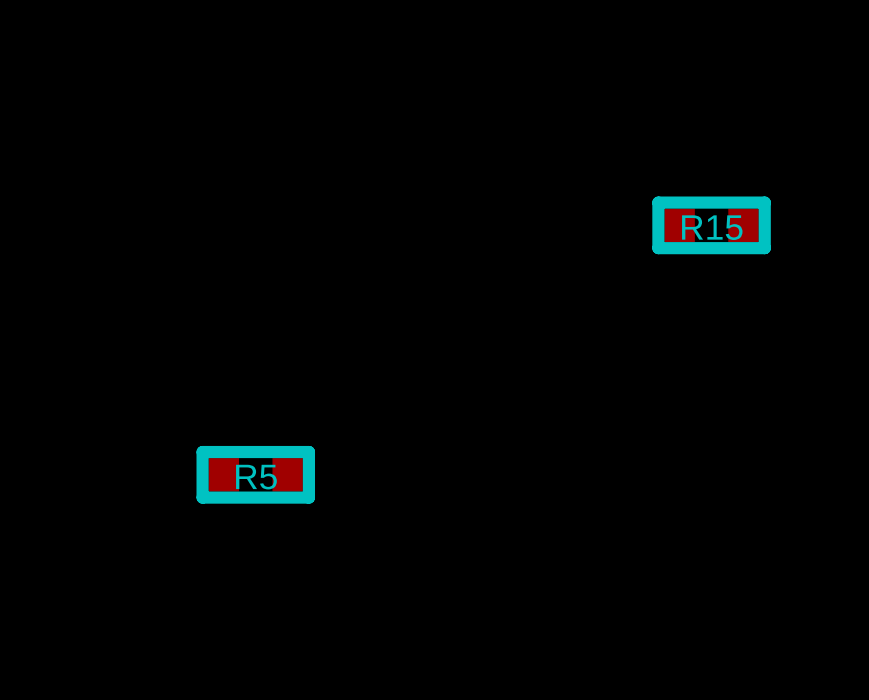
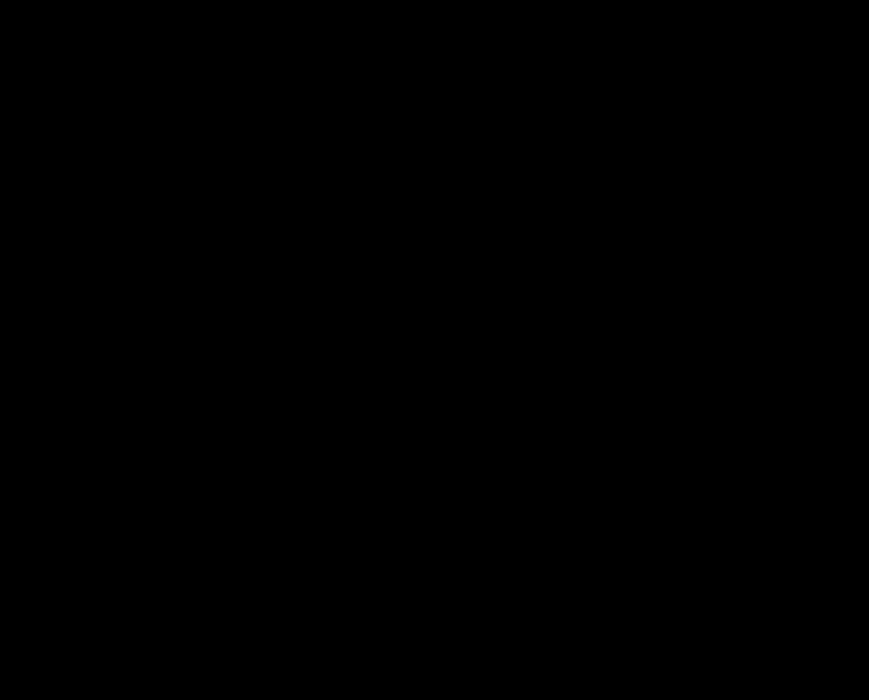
R15: (711, 225) -> none
R5: (255, 474) -> none

